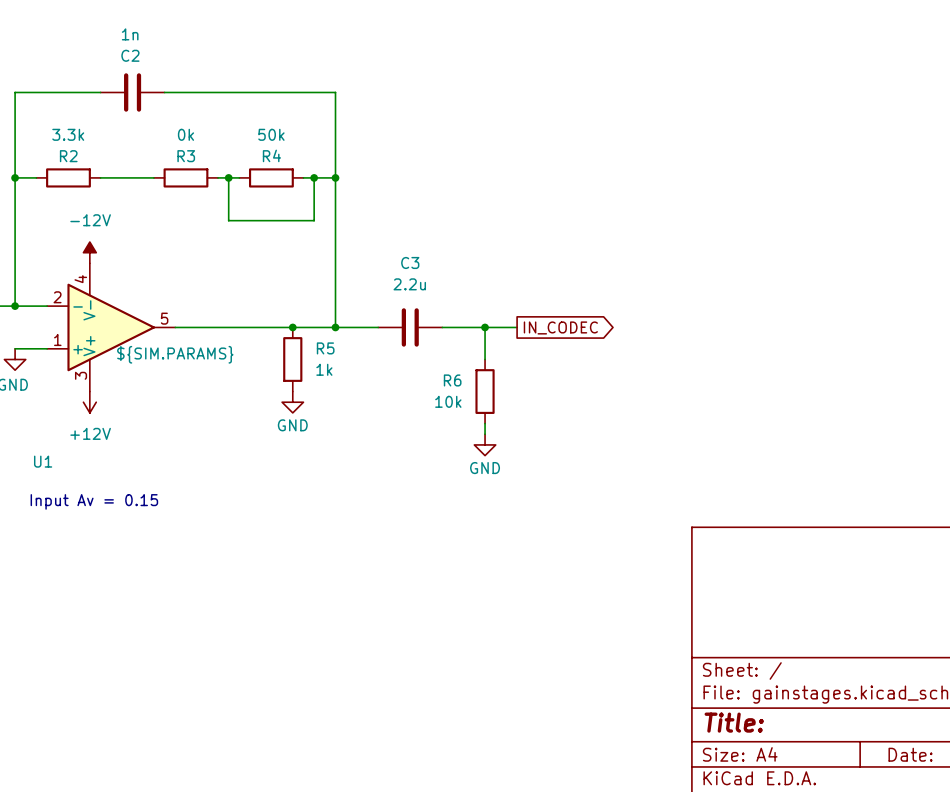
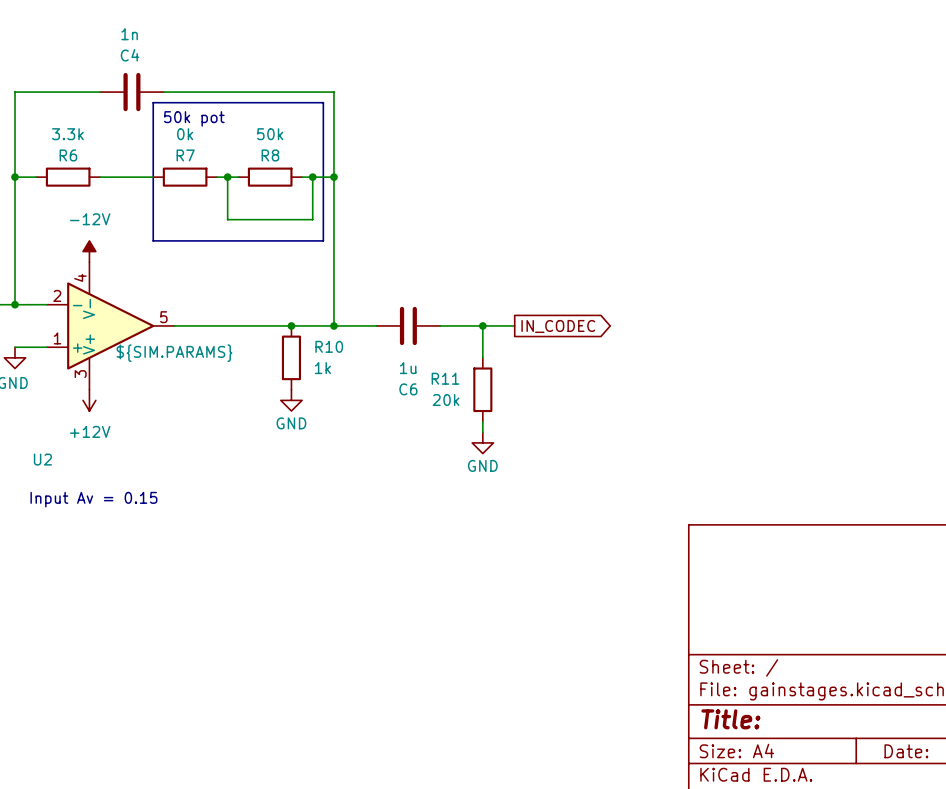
C2 name: C2 (130, 55) -> C4 (130, 55)
line: none -> (153, 102) (323, 102) (323, 240) (153, 240) (153, 102)
text: none -> 50k pot (194, 118)
R4 name: R4 (271, 155) -> R8 (270, 155)
R2 name: R2 (68, 156) -> R6 (68, 155)
R3 name: R3 (186, 156) -> R7 (185, 155)
C3 name: C3 (410, 262) -> C6 (408, 389)
C3 value: 2.2u (409, 284) -> 1u (408, 368)
R5 name: R5 (325, 348) -> R10 (329, 346)
R6 name: R6 (452, 380) -> R11 (445, 378)
R6 value: 10k (448, 401) -> 20k (446, 400)
U1 name: U1 (43, 461) -> U2 (42, 459)

